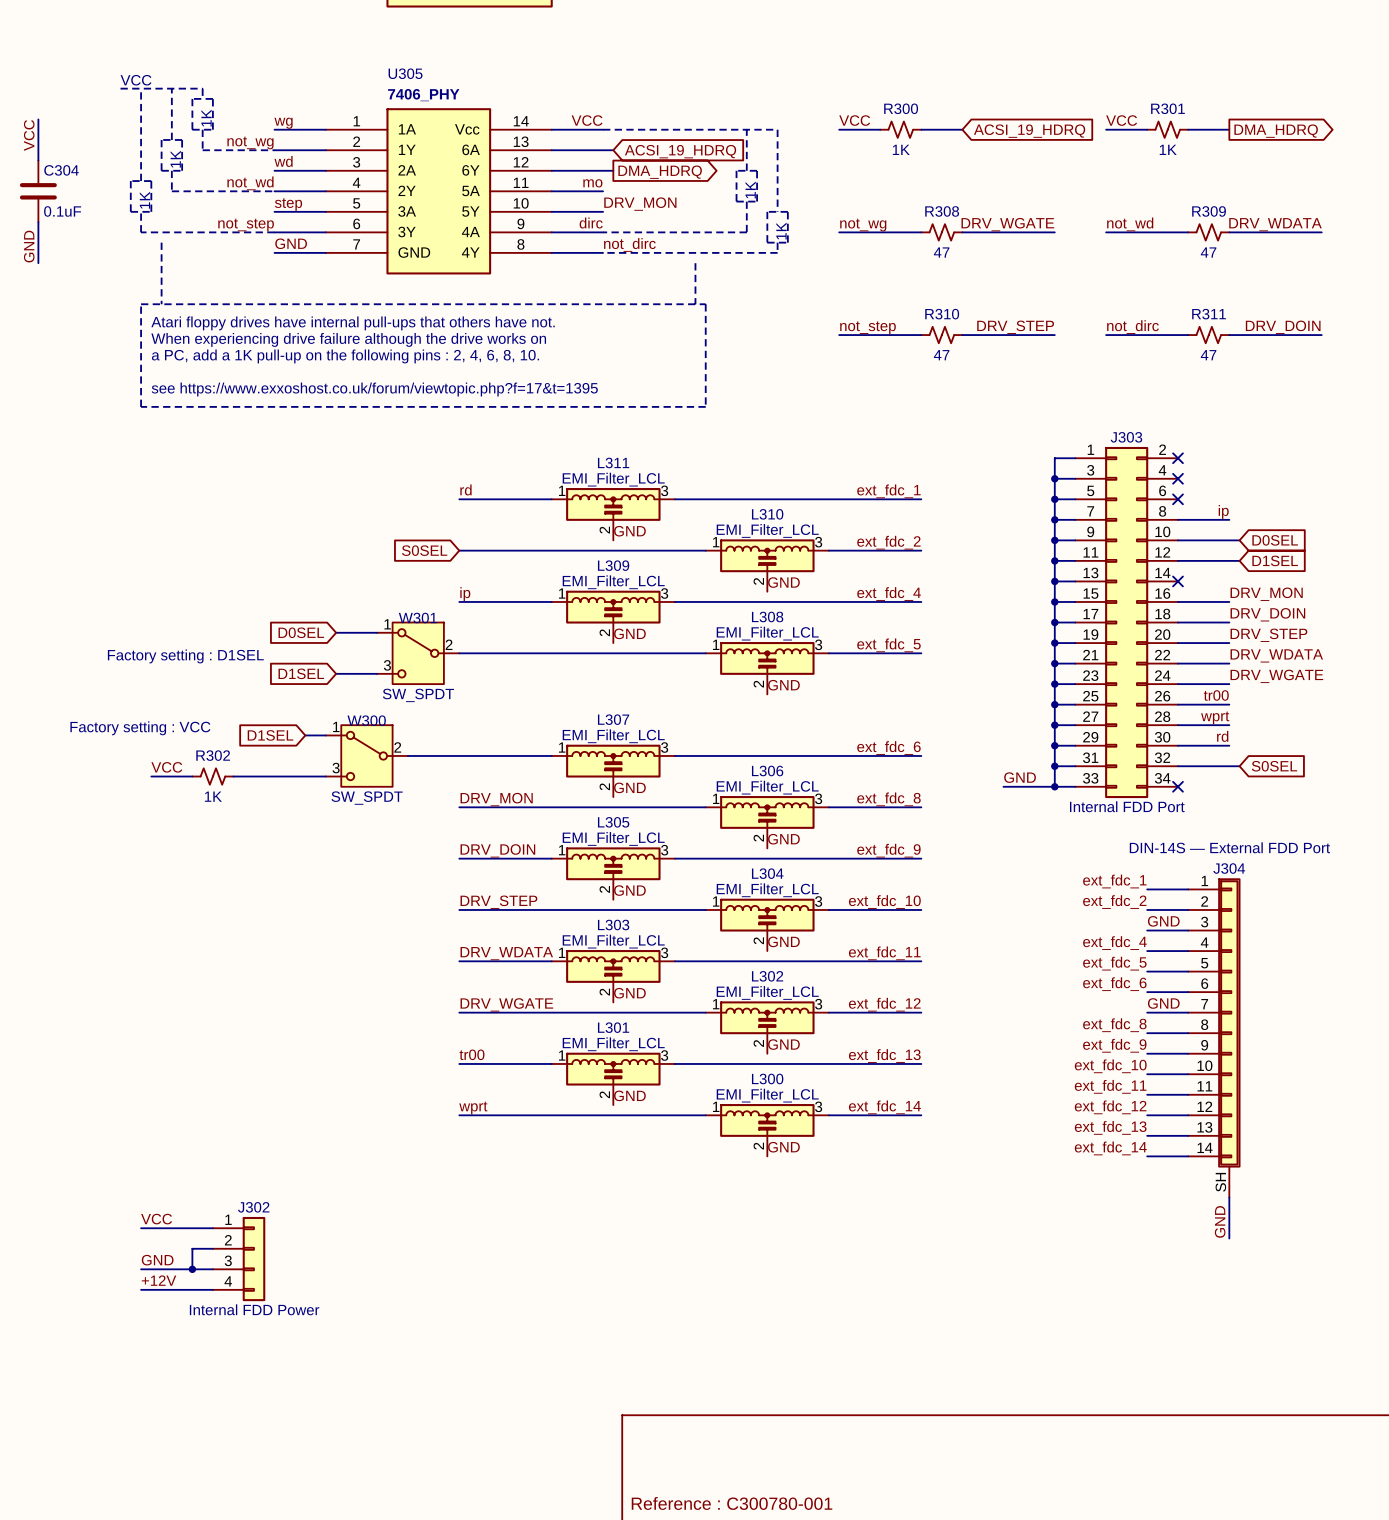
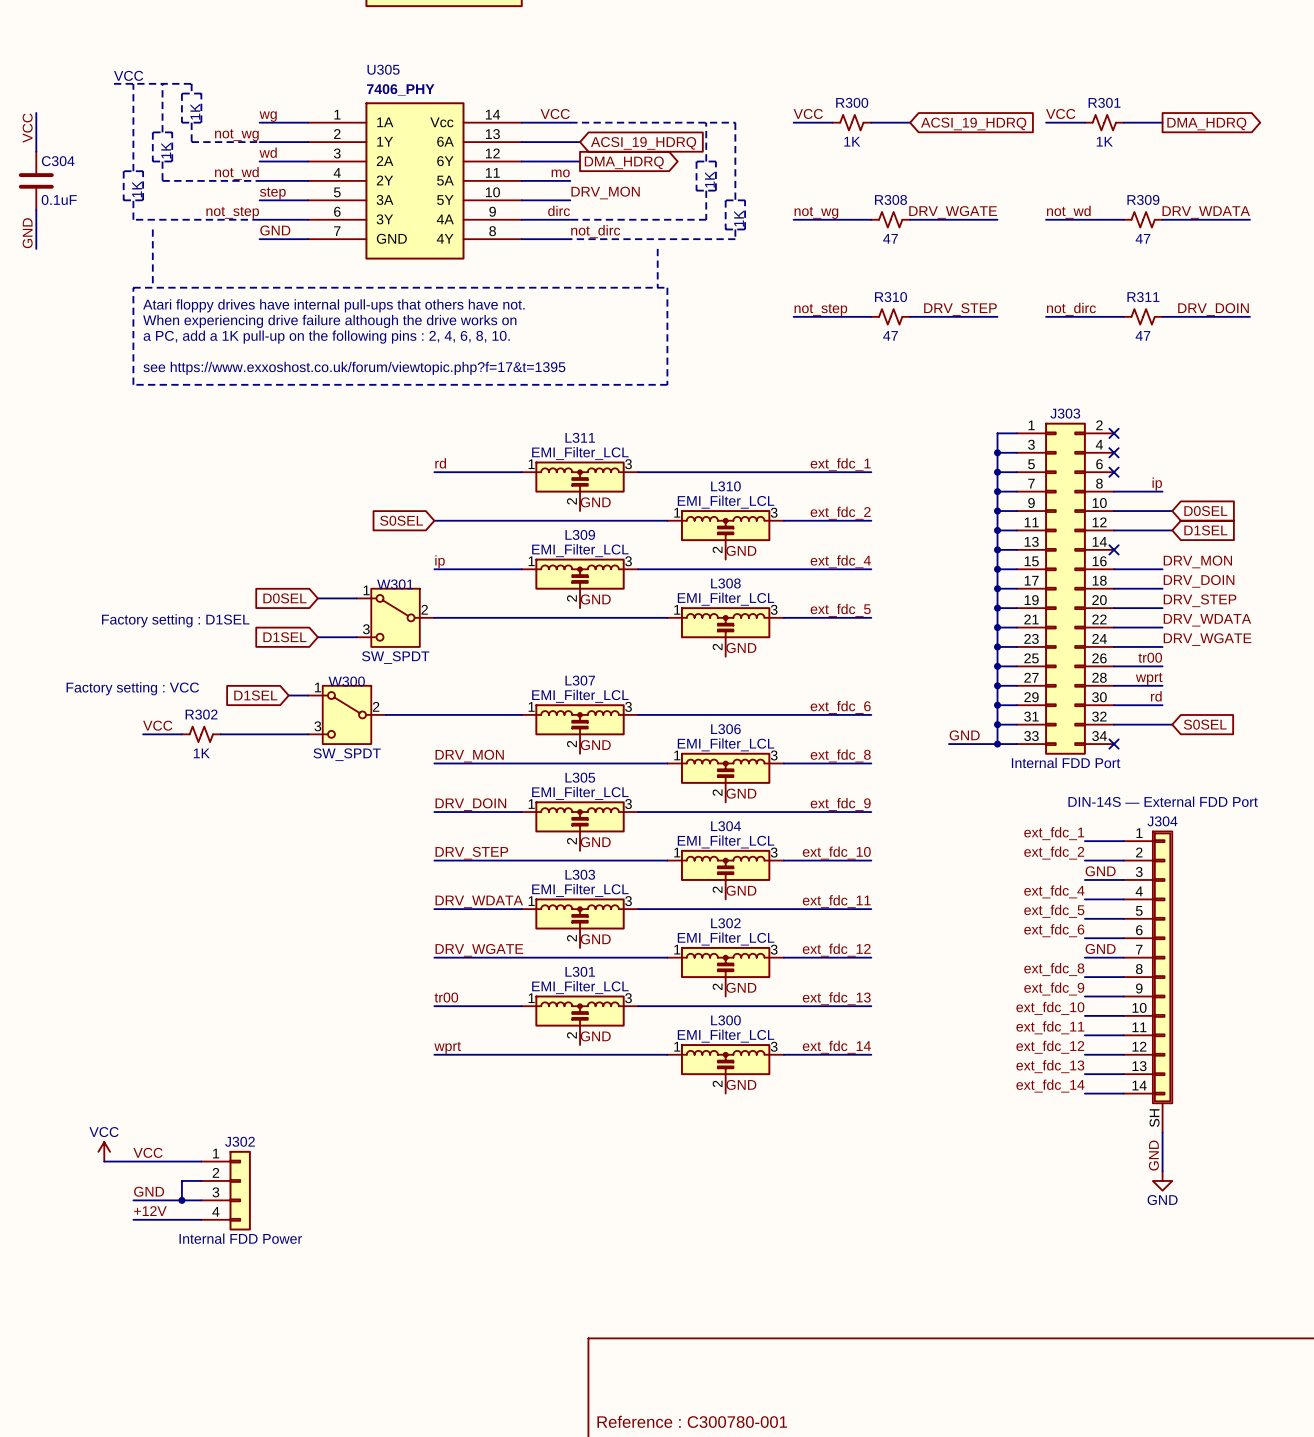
power symbol: none -> VCC (104, 1151)
wire: none -> (104, 1161) (133, 1161)
power symbol: none -> GND (1162, 1180)

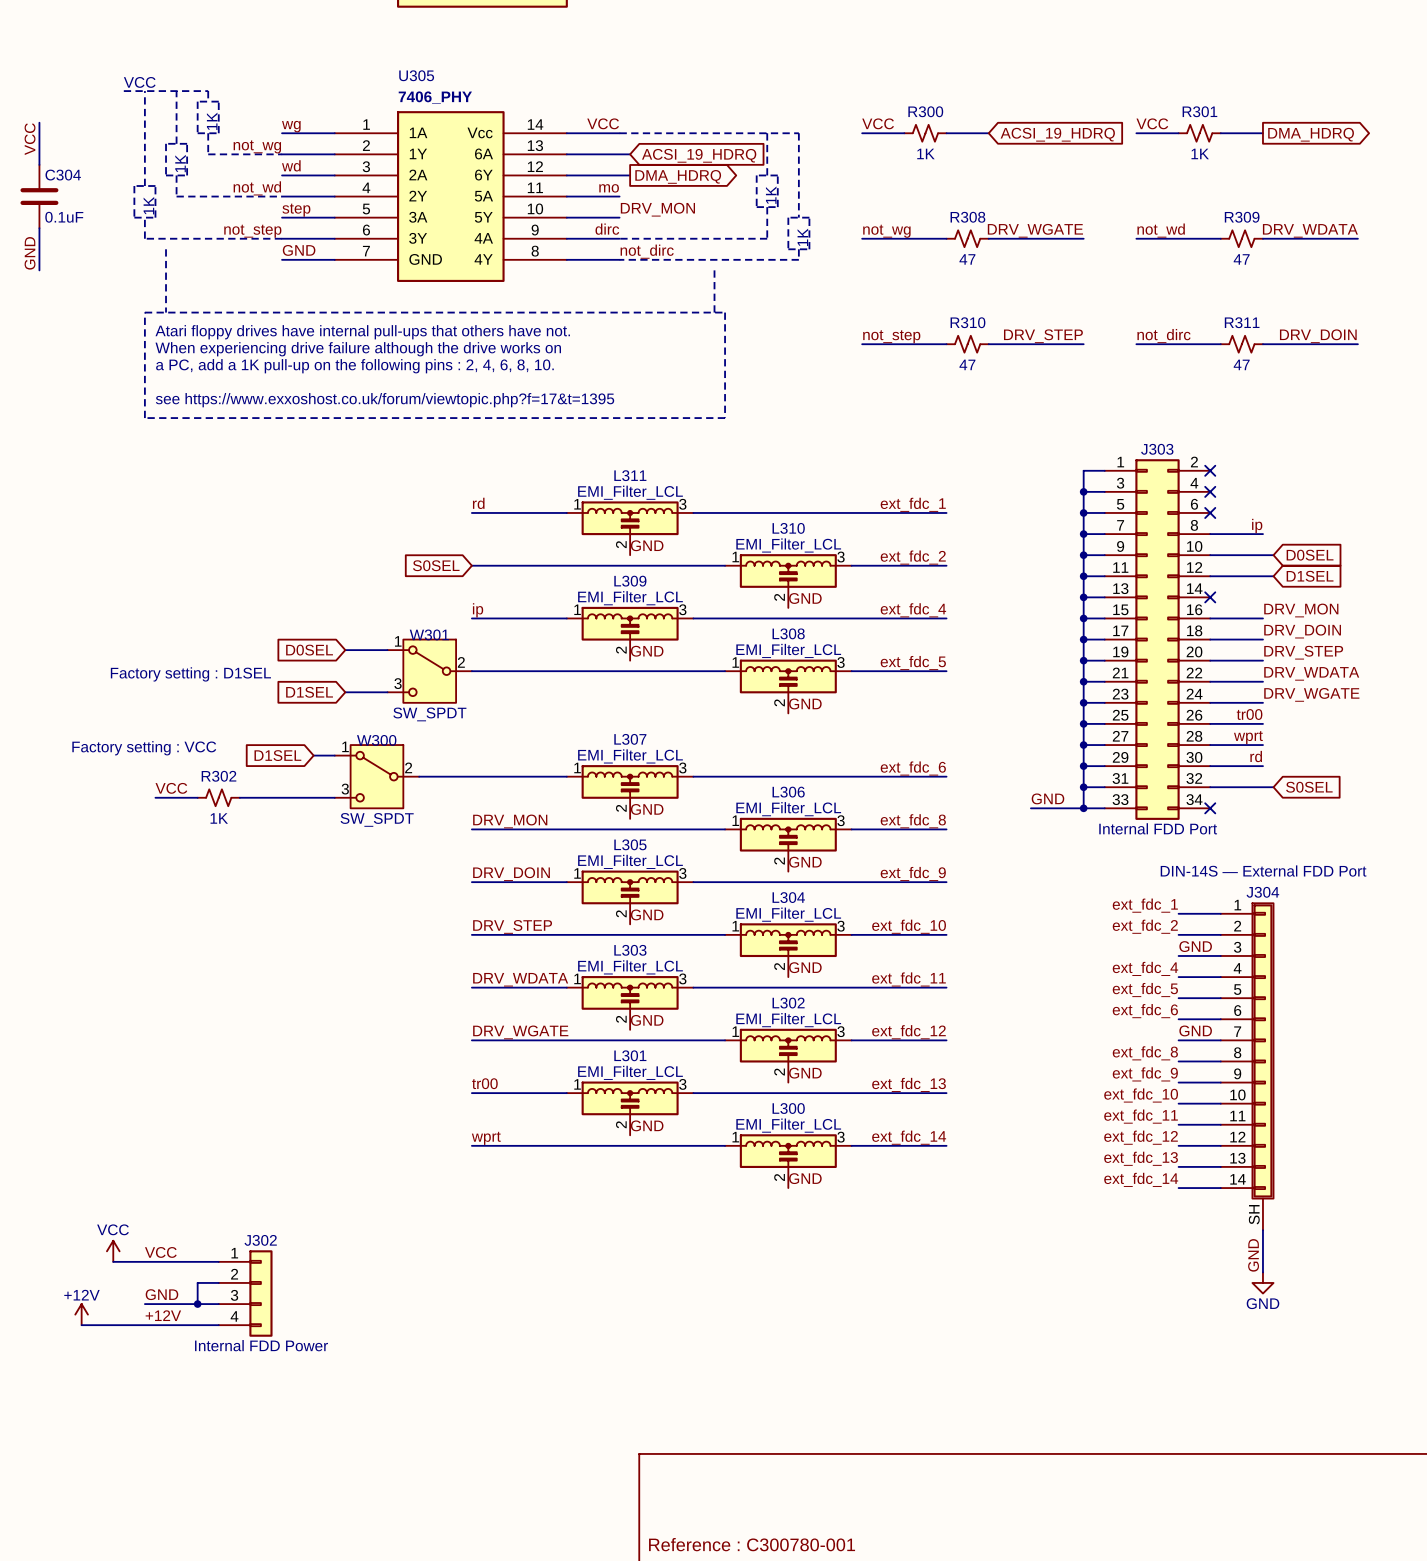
power symbol: none -> +12V (81, 1314)
wire: none -> (81, 1325) (144, 1325)

